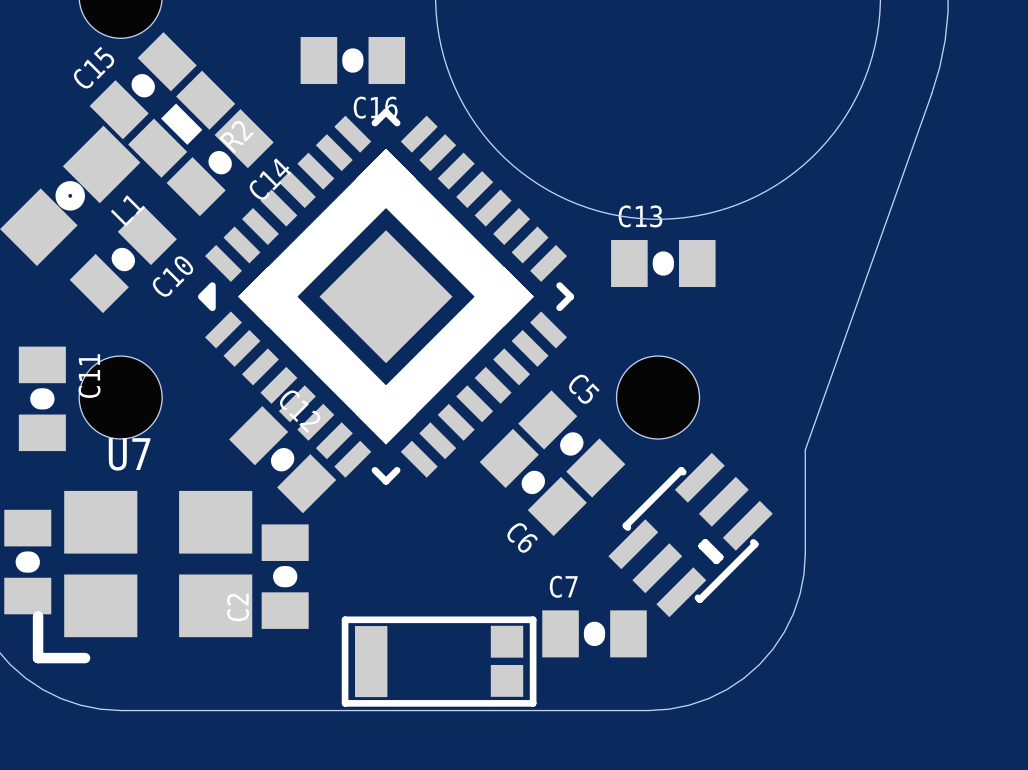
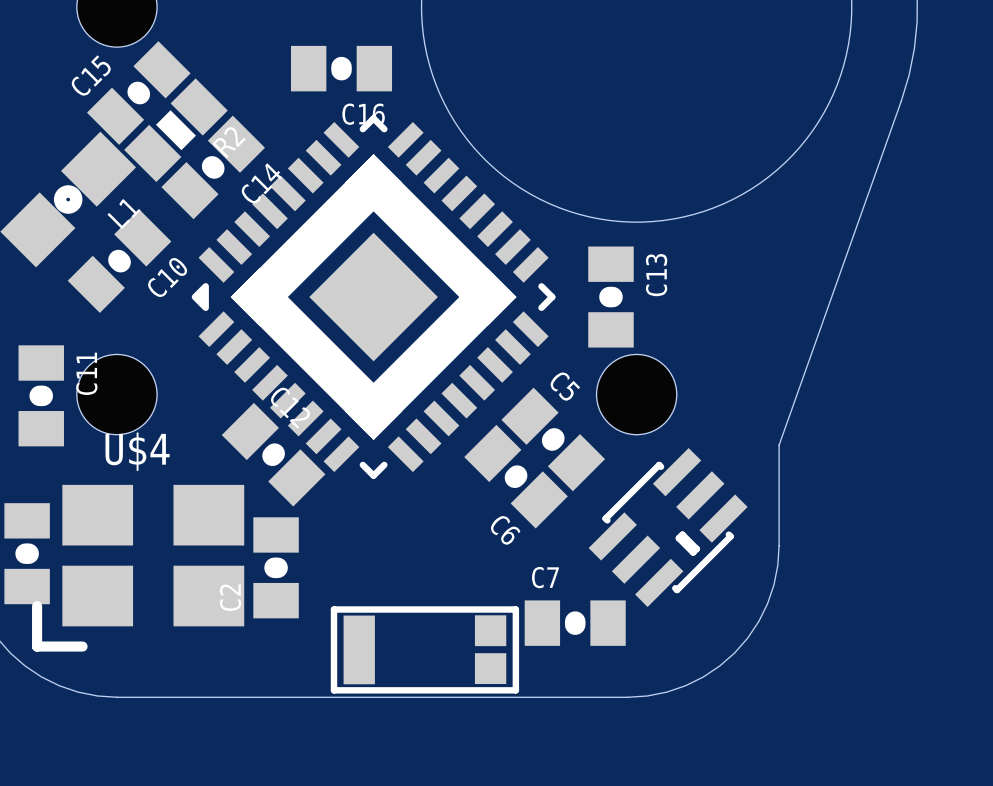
C13 rotation: 0° (663, 263) -> 90° clockwise (610, 297)
U7 name: U7 (129, 454) -> U$4 (137, 451)

